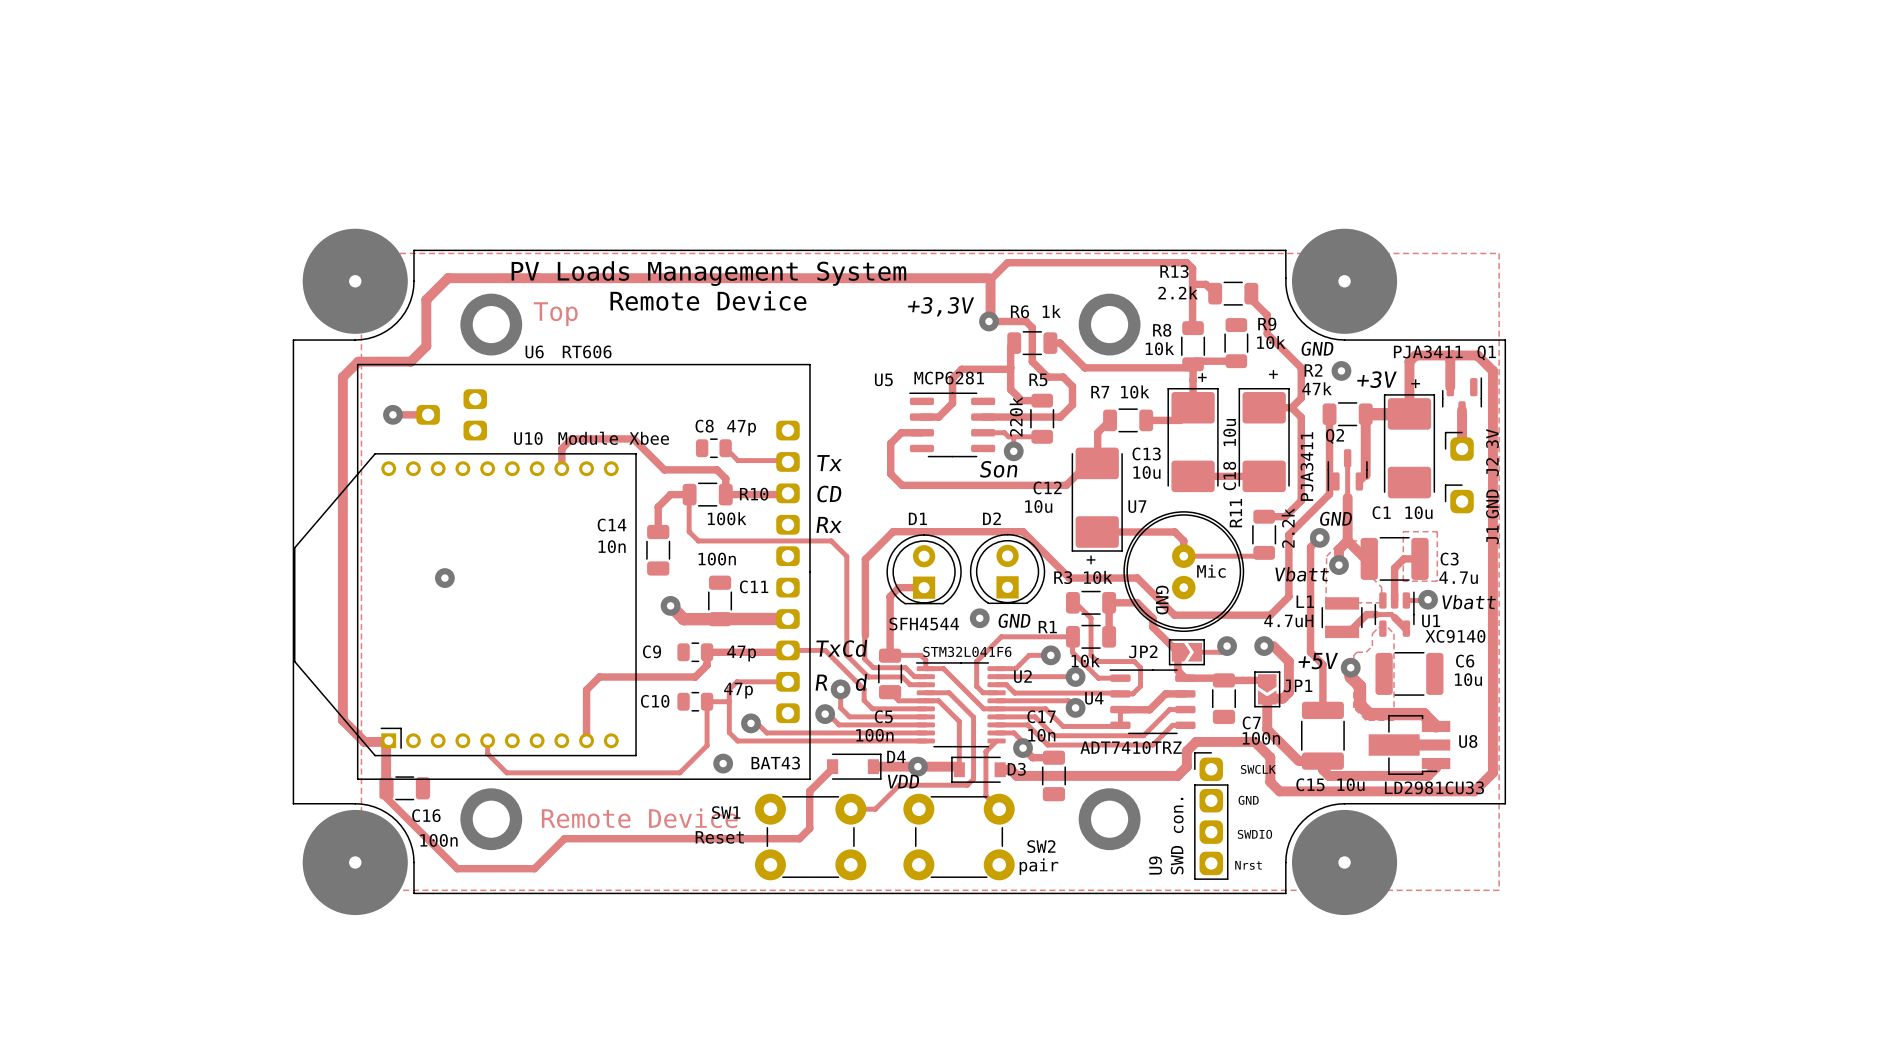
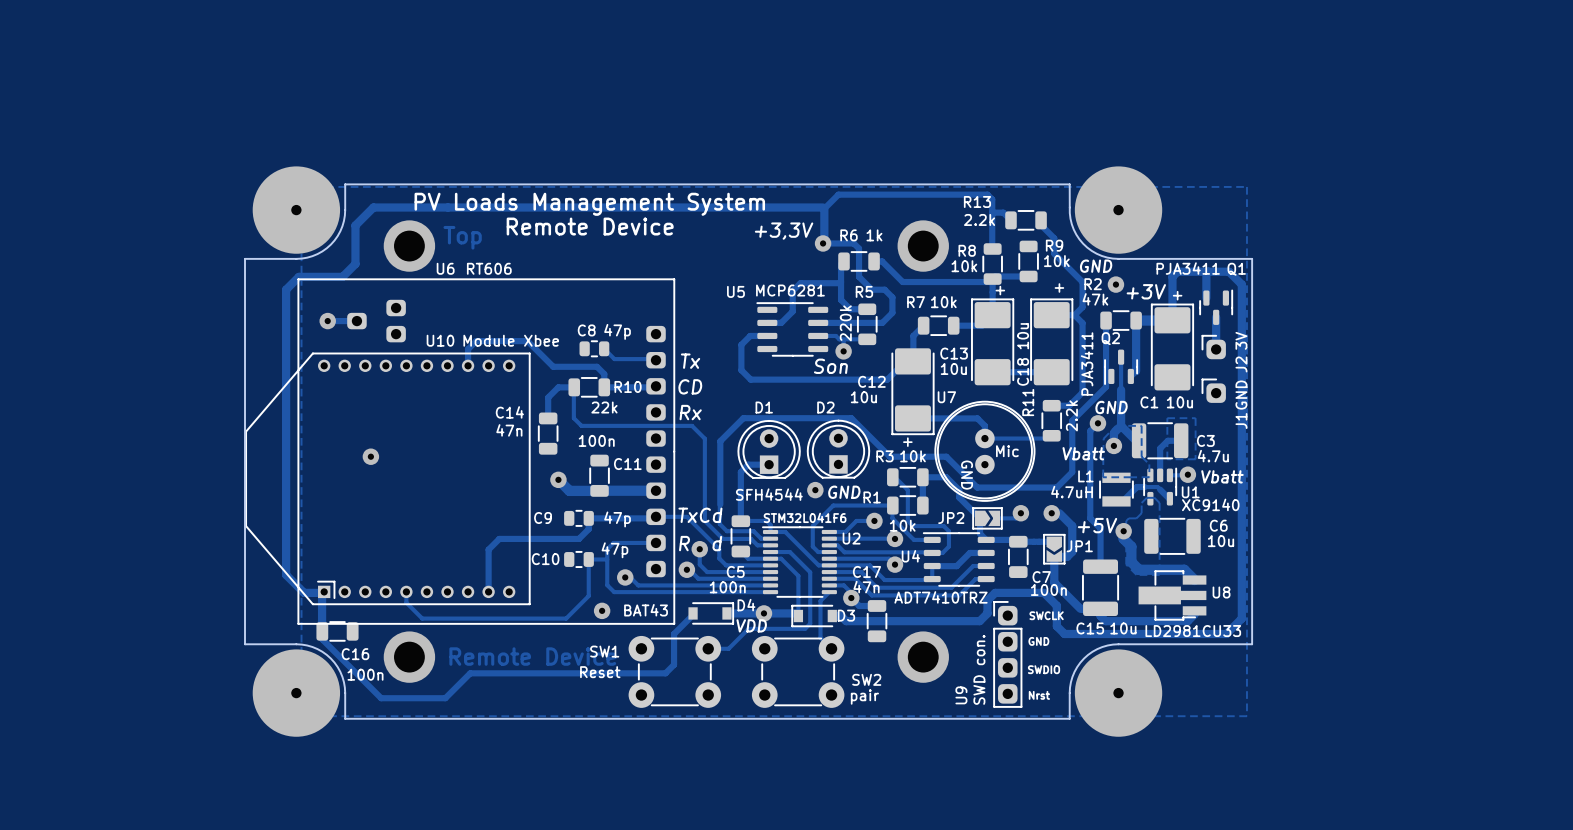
text: 100k (727, 518) -> 22k (604, 407)
text: 10n (612, 546) -> 47n (509, 430)
text: 10n (1041, 735) -> 47n (866, 587)

